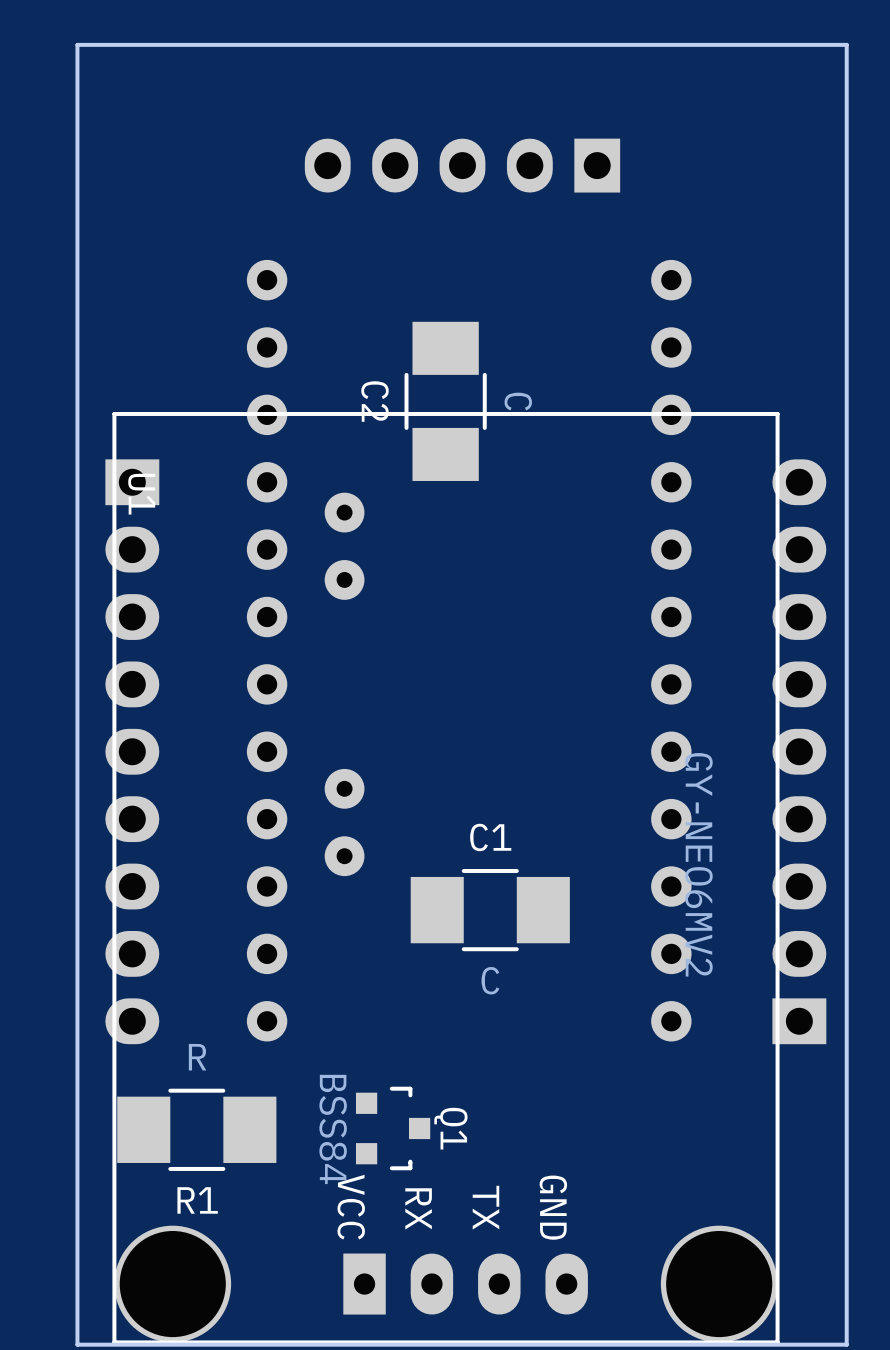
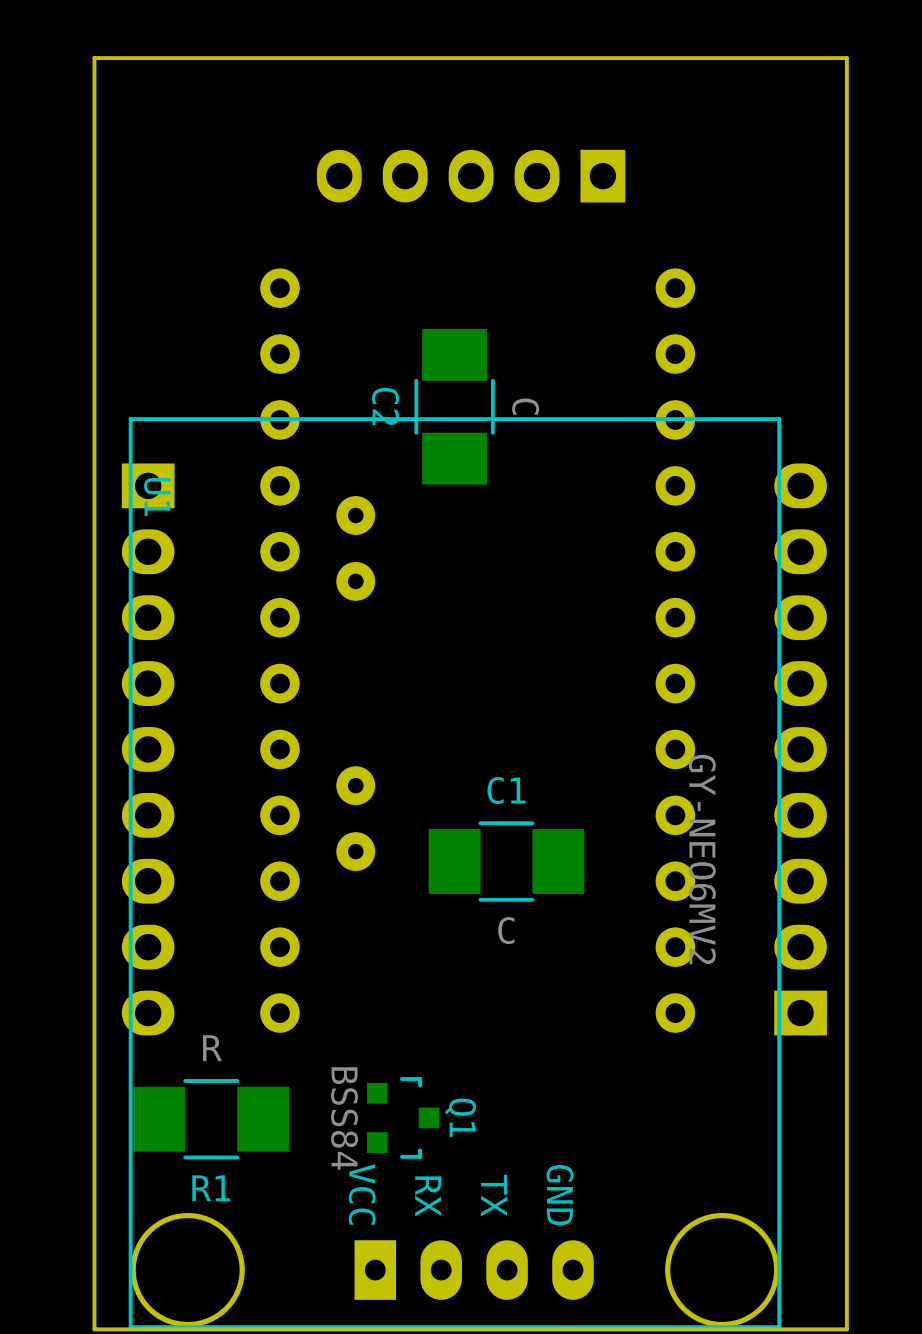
C1 position: (490, 910) -> (506, 861)

